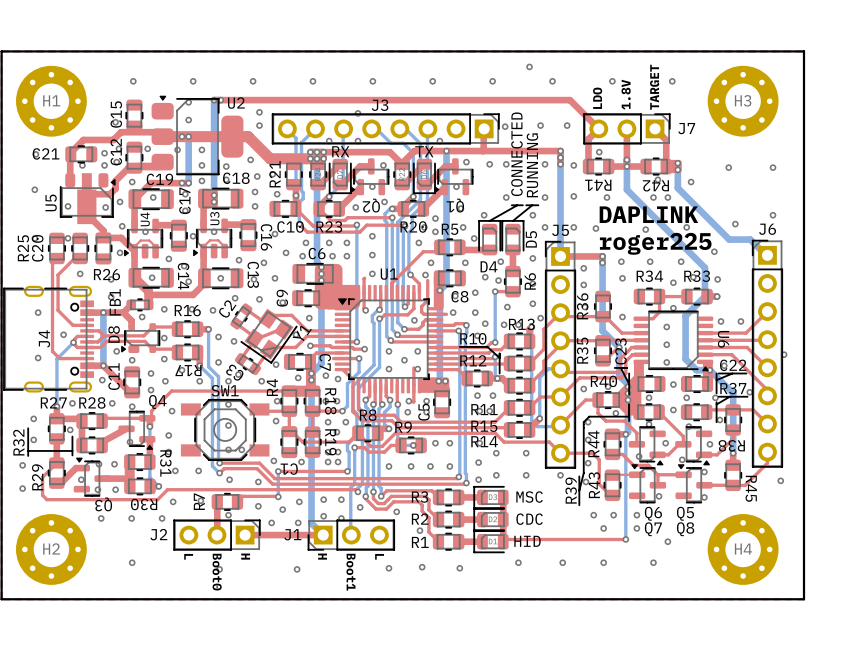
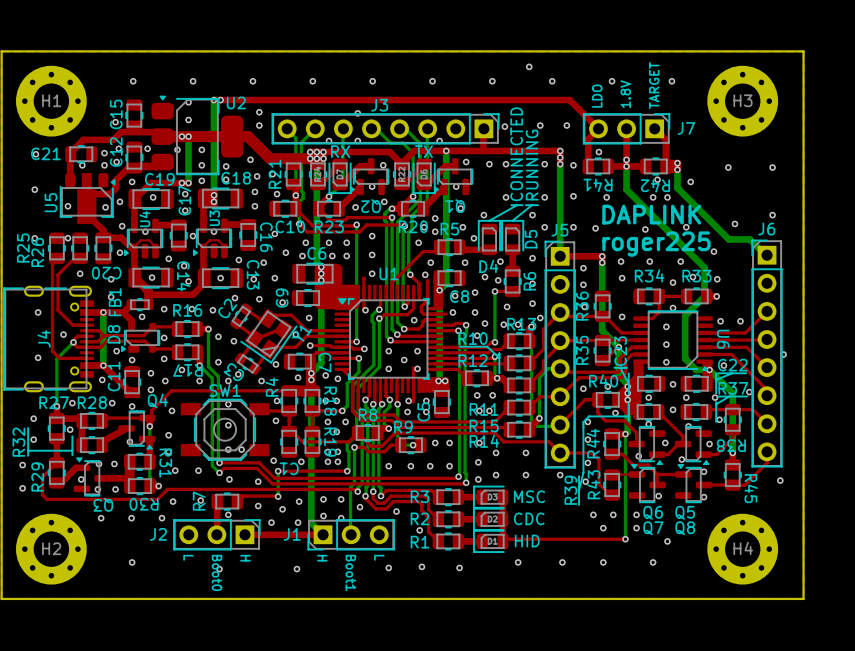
C20 name rotation: 0° (37, 248) -> 90° counterclockwise (106, 273)
C20 name position: C20 (37, 248) -> C20 (106, 273)
R26 name rotation: 0° (106, 274) -> 90° counterclockwise (37, 252)
R26 name position: R26 (106, 274) -> R26 (37, 252)

